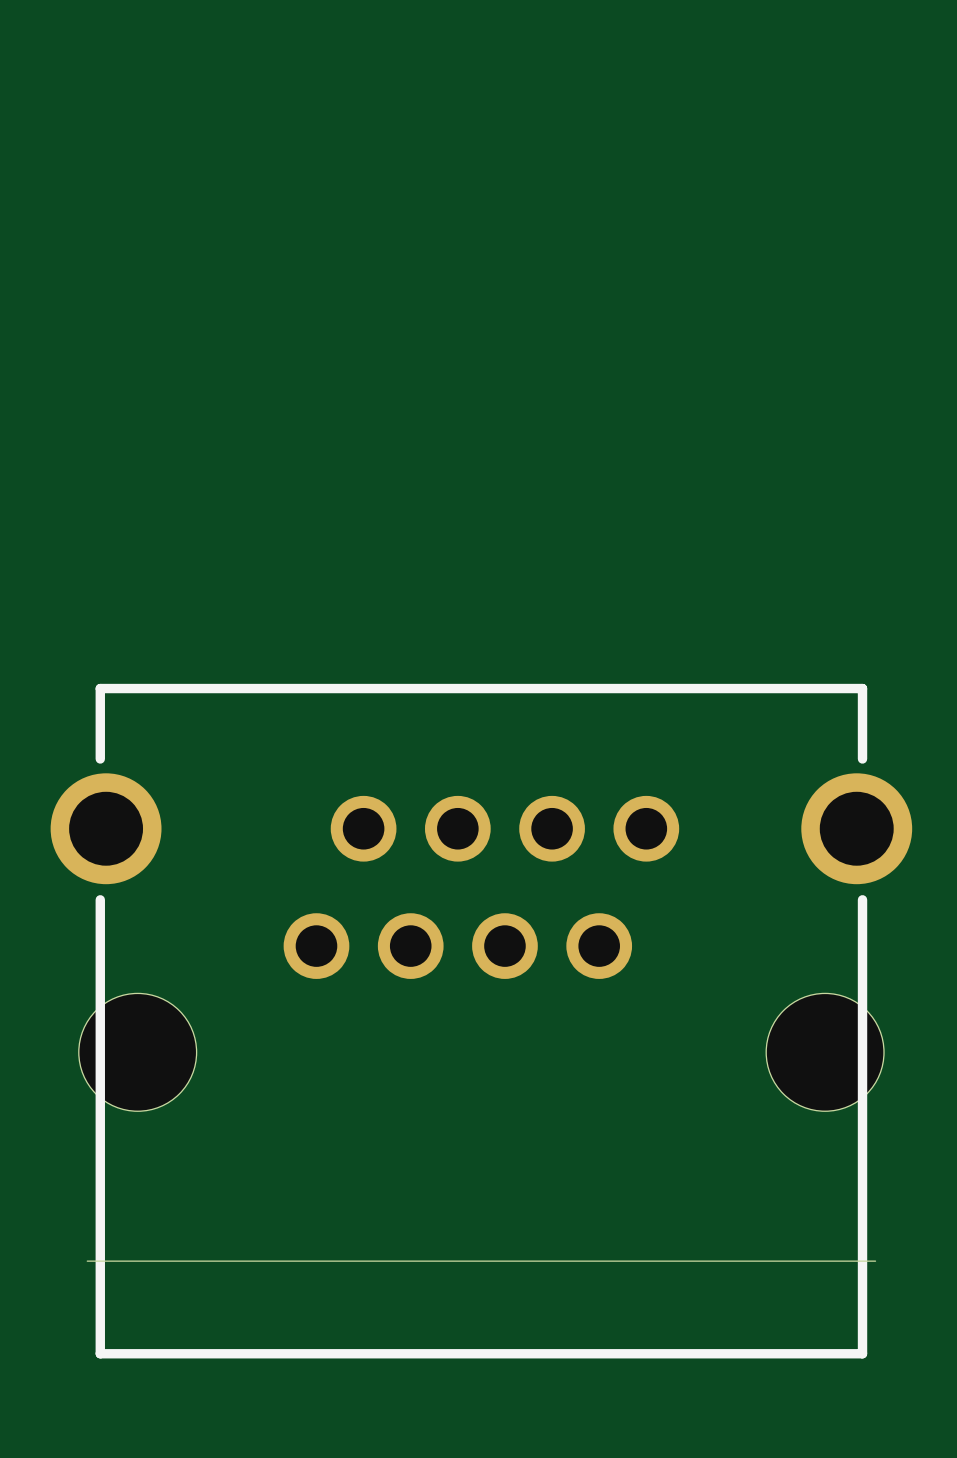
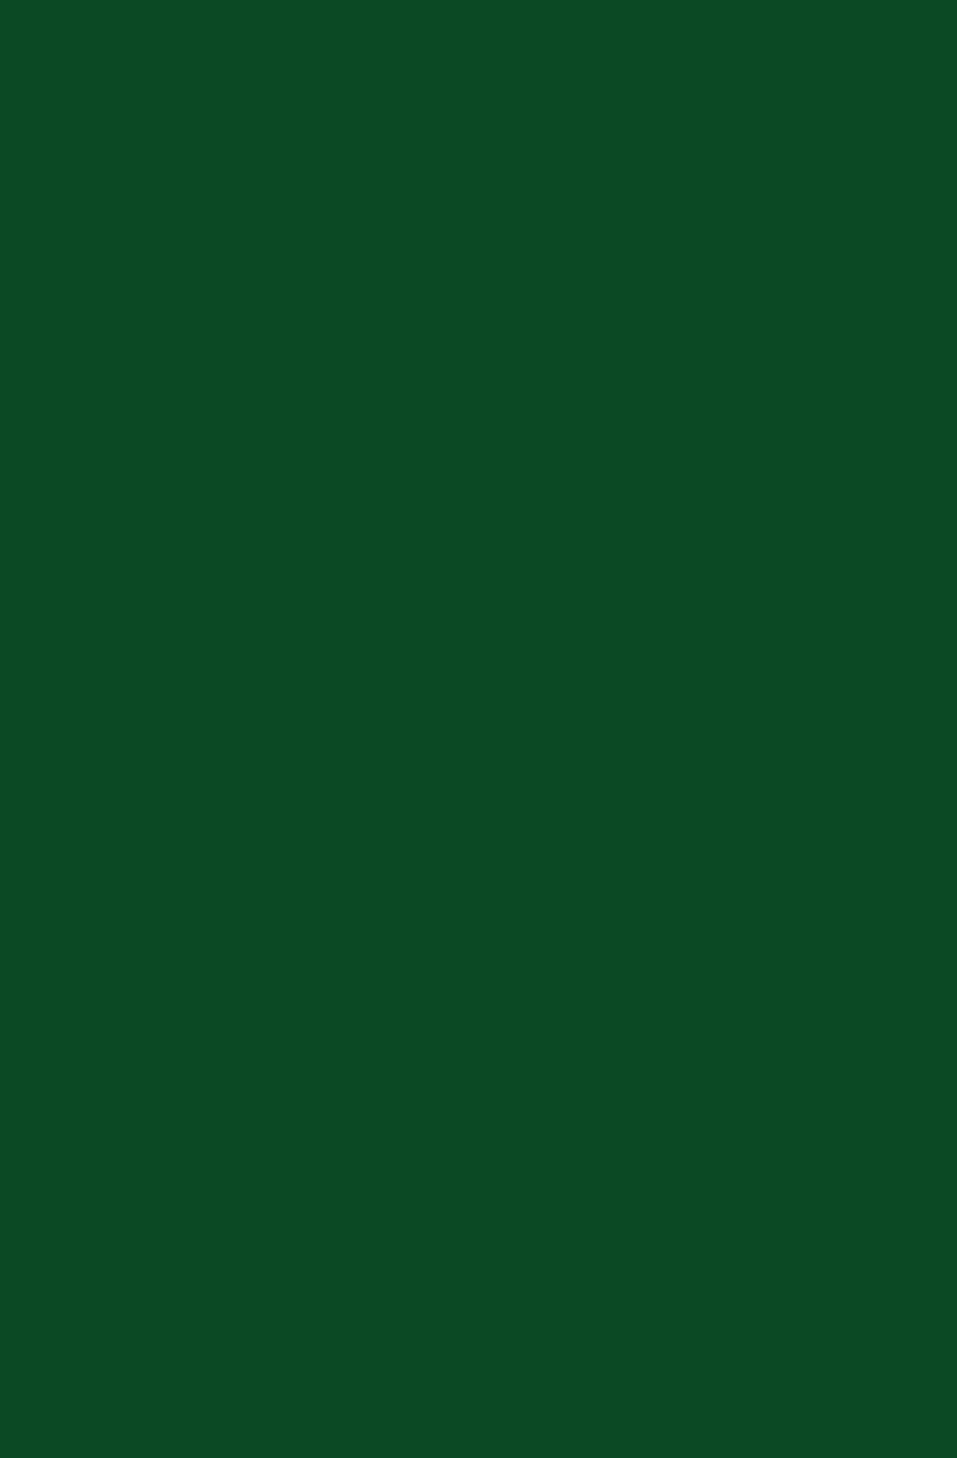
part: (481, 1021) -> none

